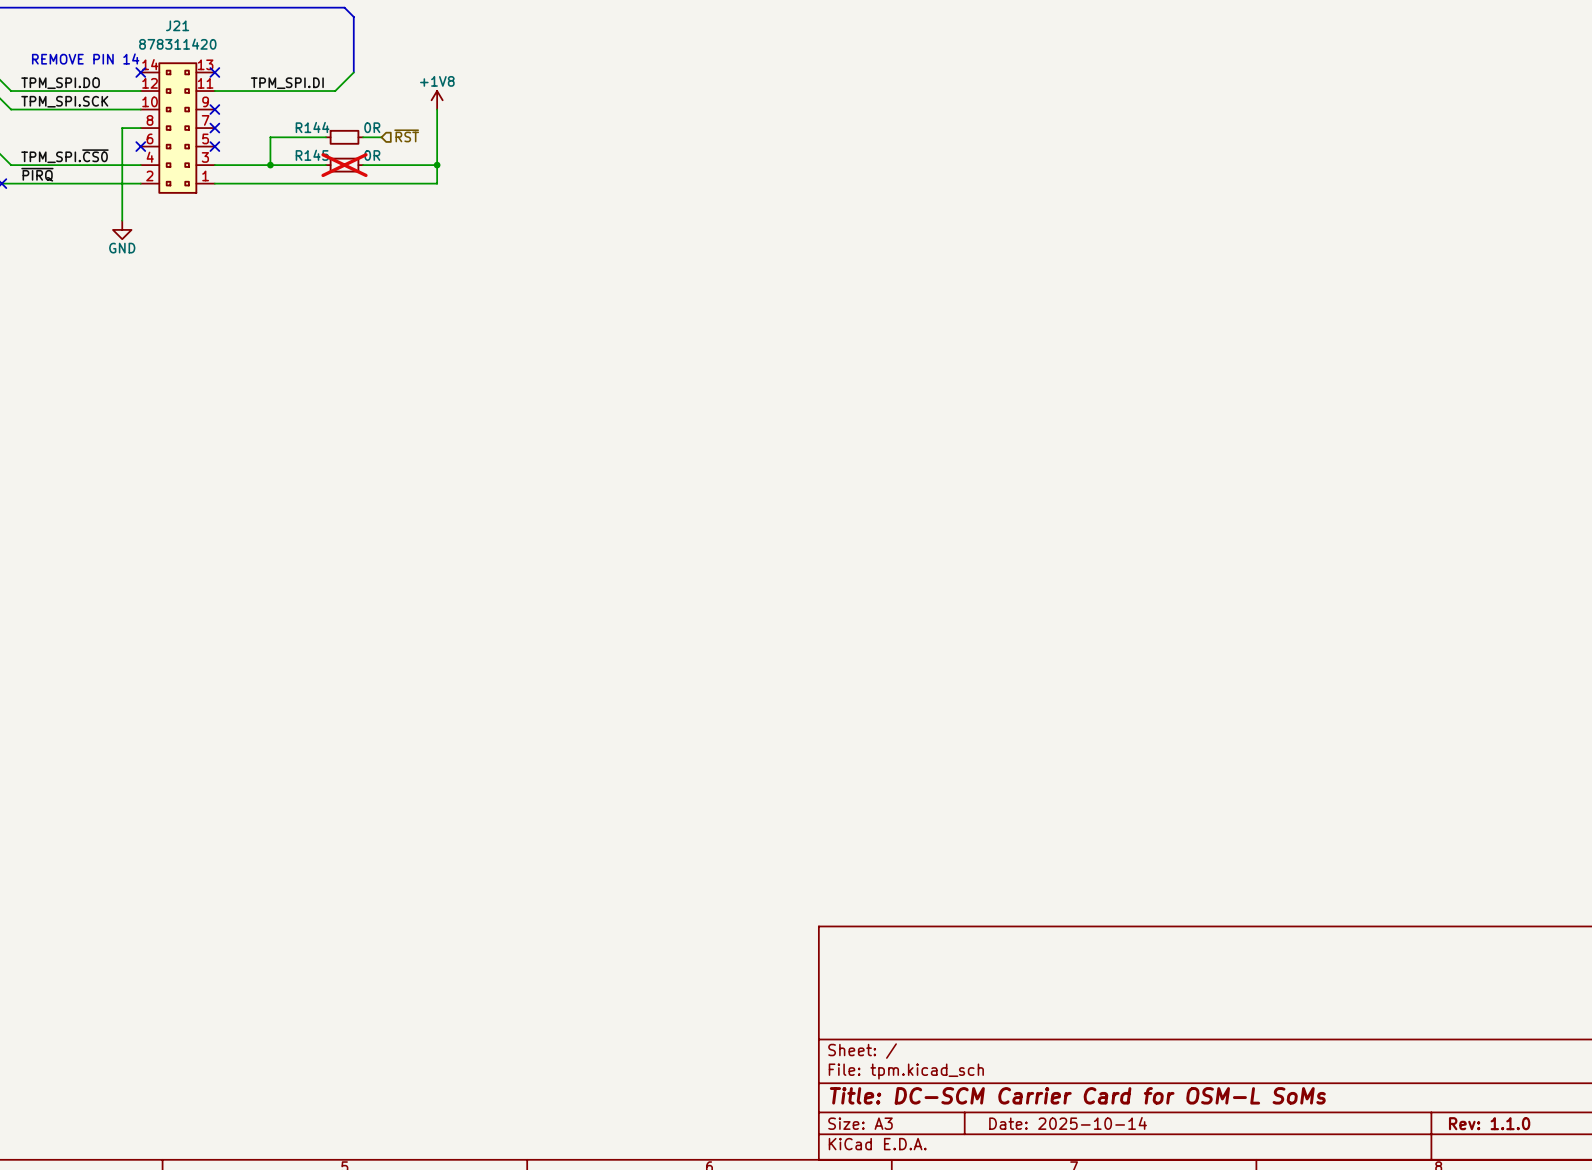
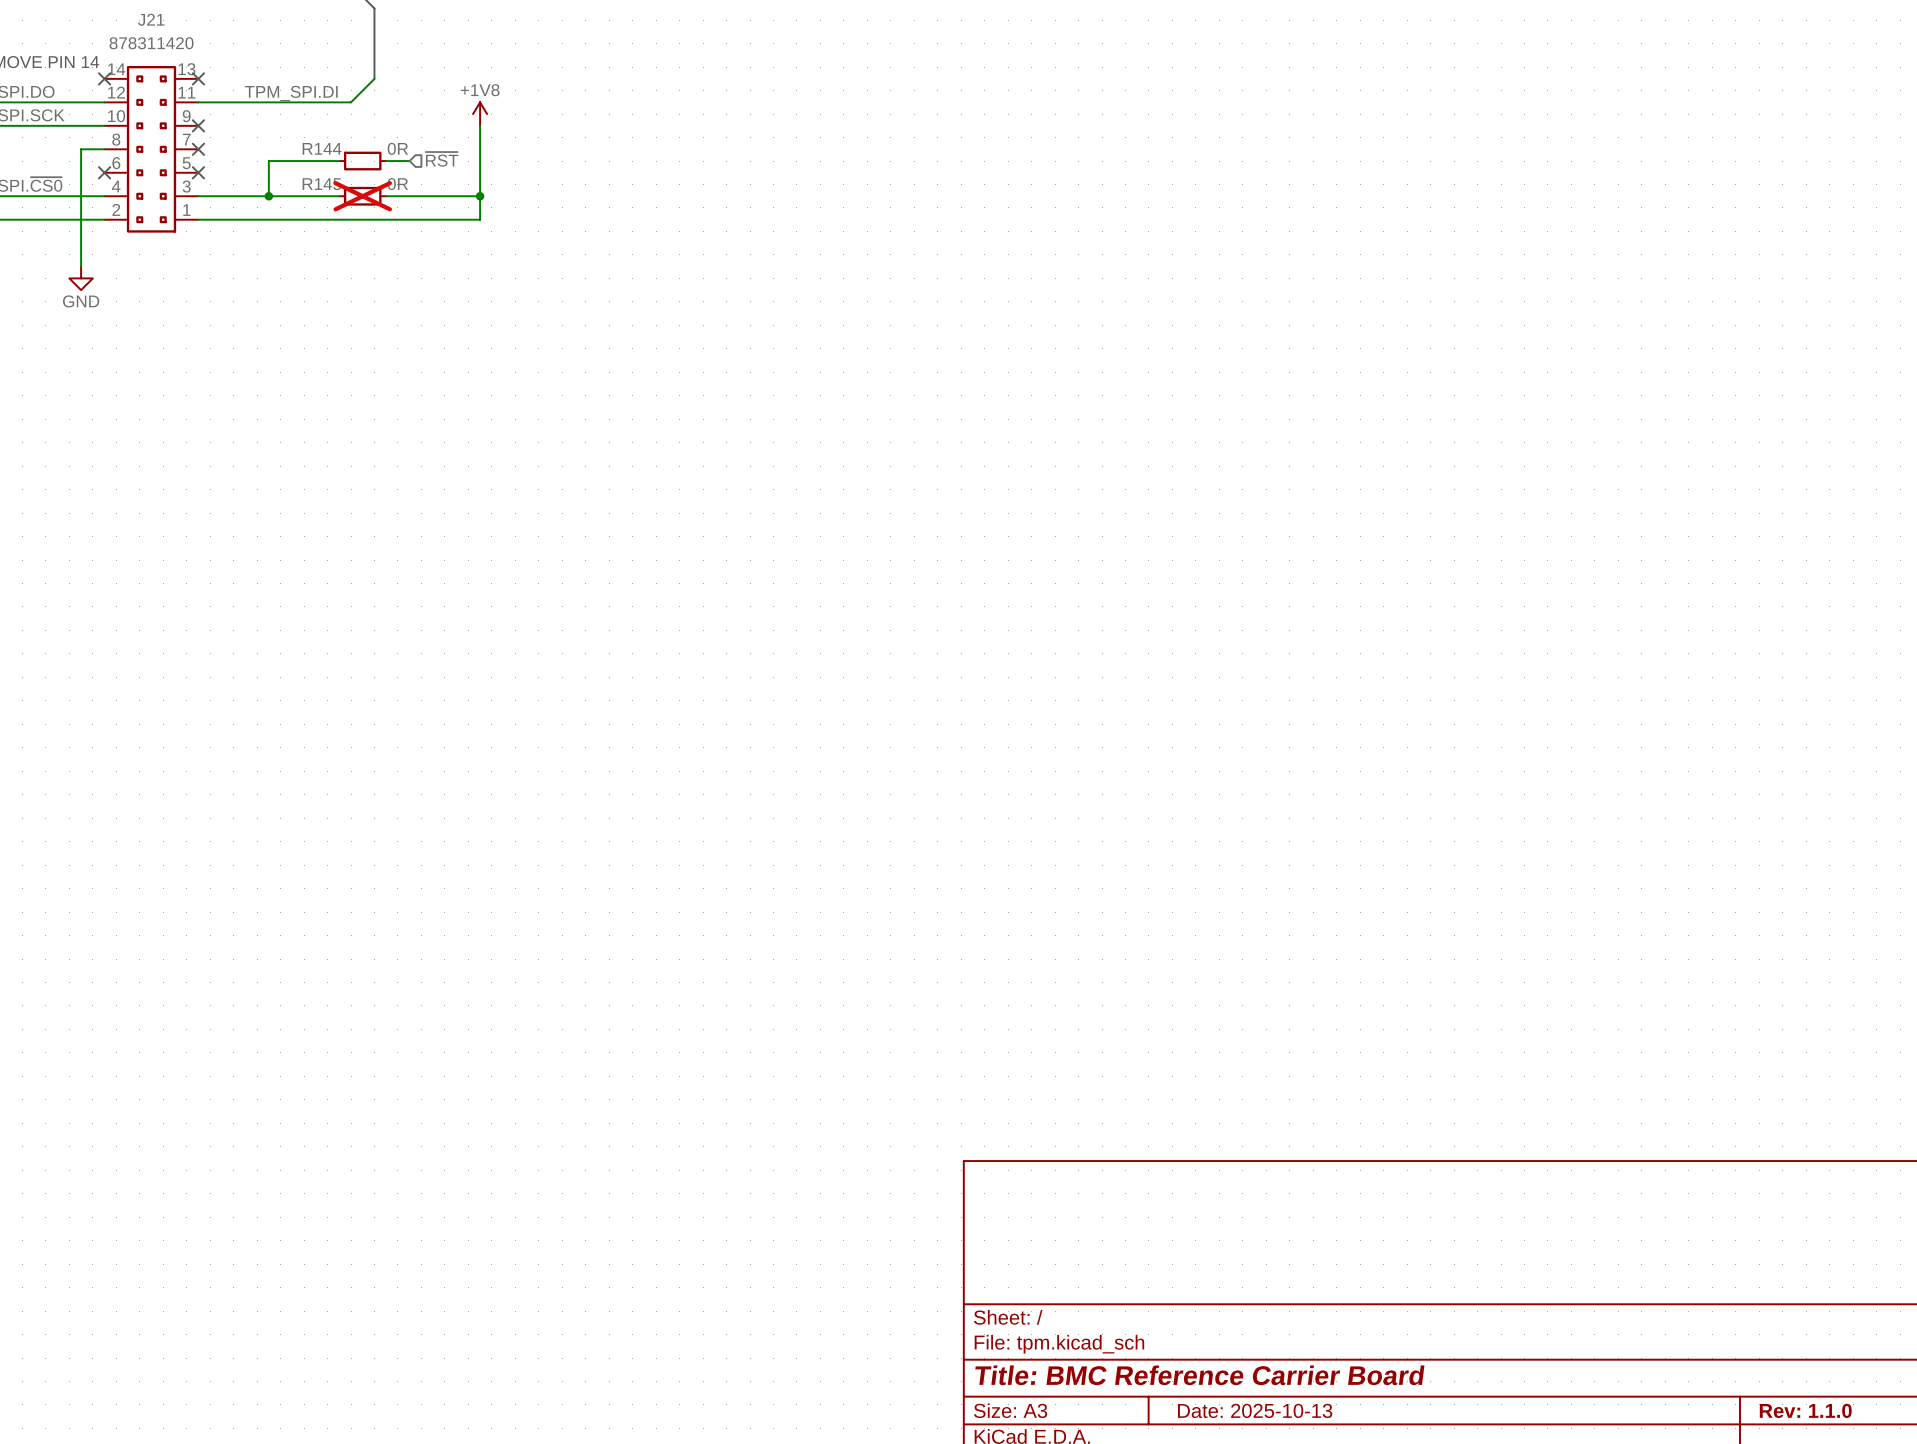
title block: Title: DC-SCM Carrier Card for OSM-L SoMs (1077, 1095) -> Title: BMC Reference Carrier Board (1199, 1375)
title block: Date: 2025-10-14 (1068, 1123) -> Date: 2025-10-13 (1255, 1410)

